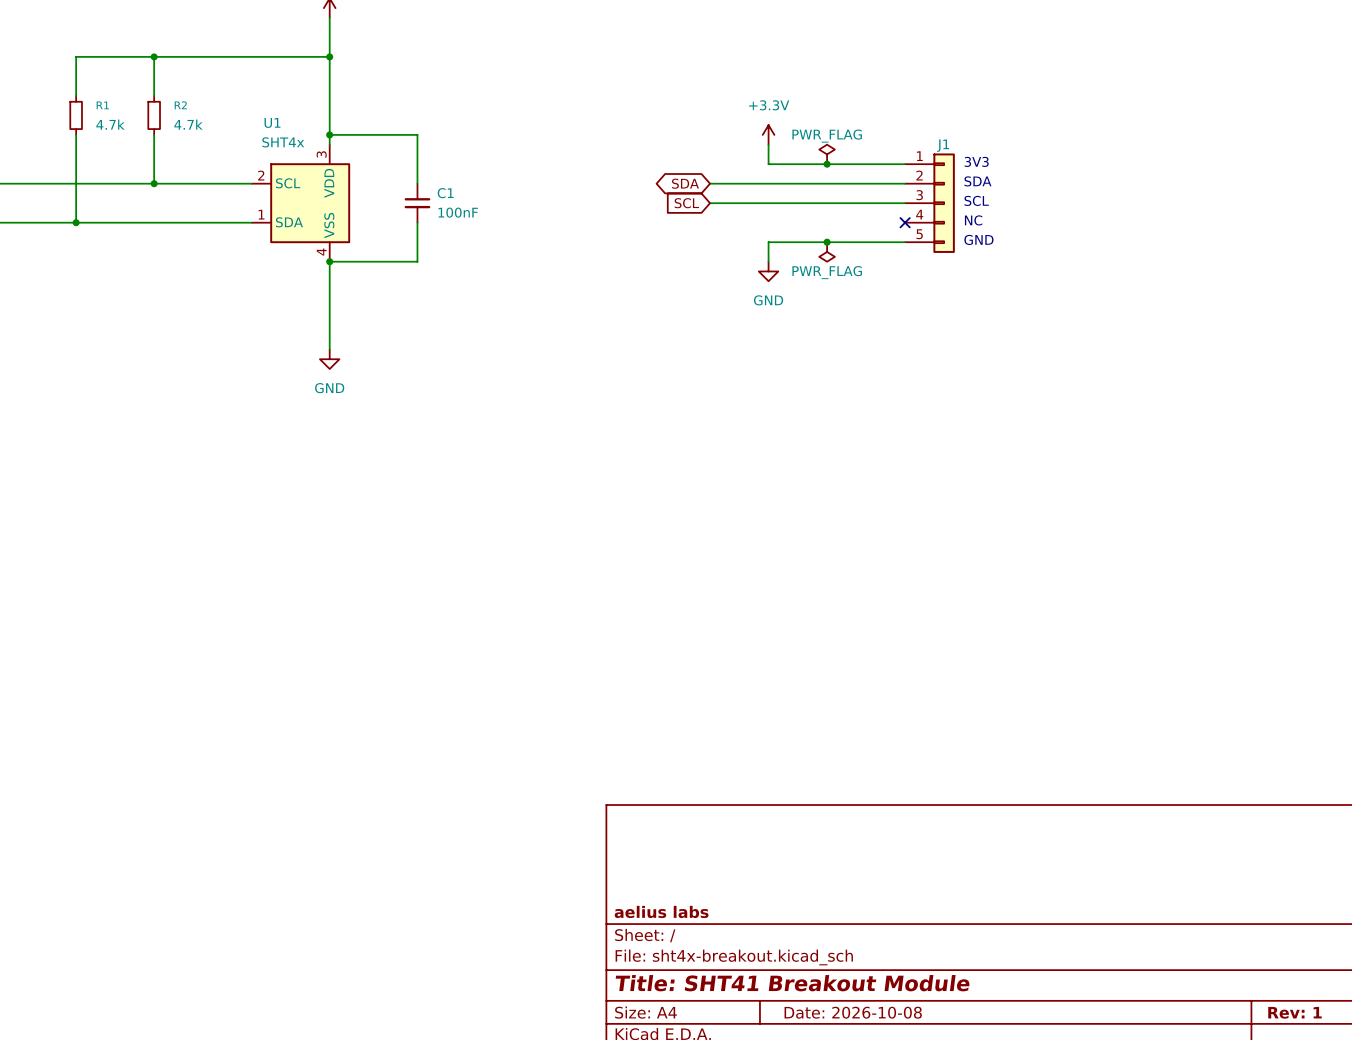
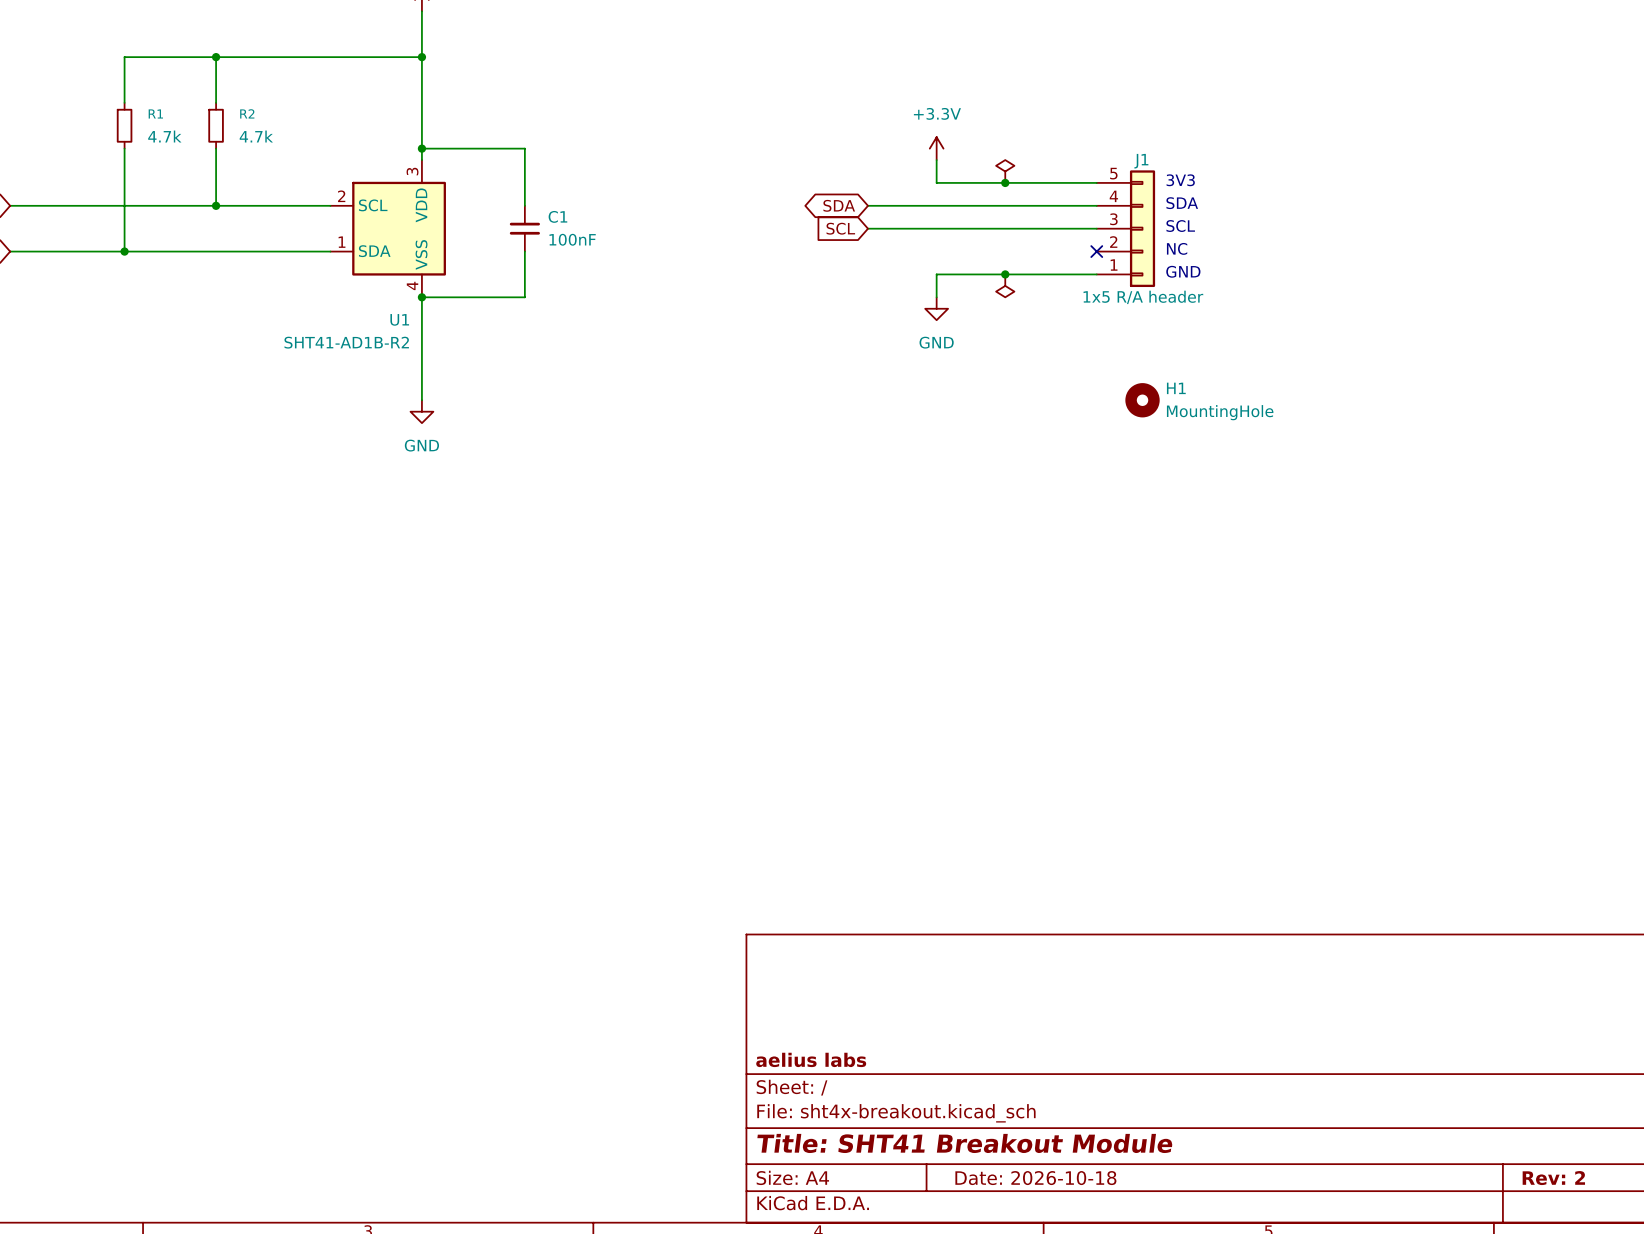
U1 name position: U1 (272, 122) -> U1 (399, 319)
power symbol text: PWR_FLAG (827, 136) -> none
U1 value: SHT4x (283, 142) -> SHT41-AD1B-R2 (346, 342)
J1 flip: as is (944, 203) -> up-down (1142, 228)
J1 value: none -> 1x5 R/A header (1143, 297)
power symbol text: PWR_FLAG (827, 272) -> none
H1: none -> MountingHole (1142, 400)
title block: Date: 2026-10-08 (853, 1012) -> Date: 2026-10-18 (1035, 1178)
title block: Rev: 1 (1294, 1012) -> Rev: 2 (1553, 1178)

